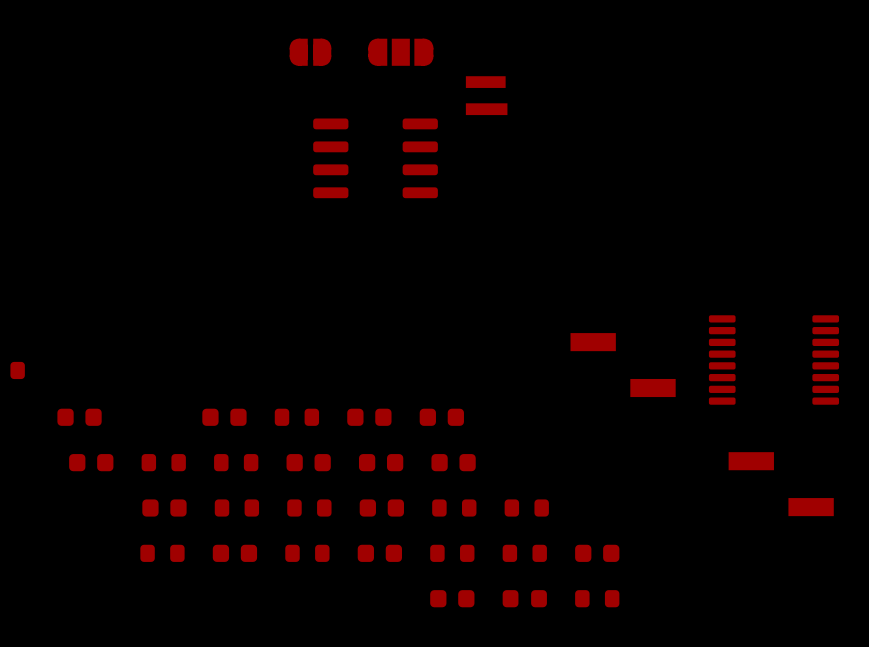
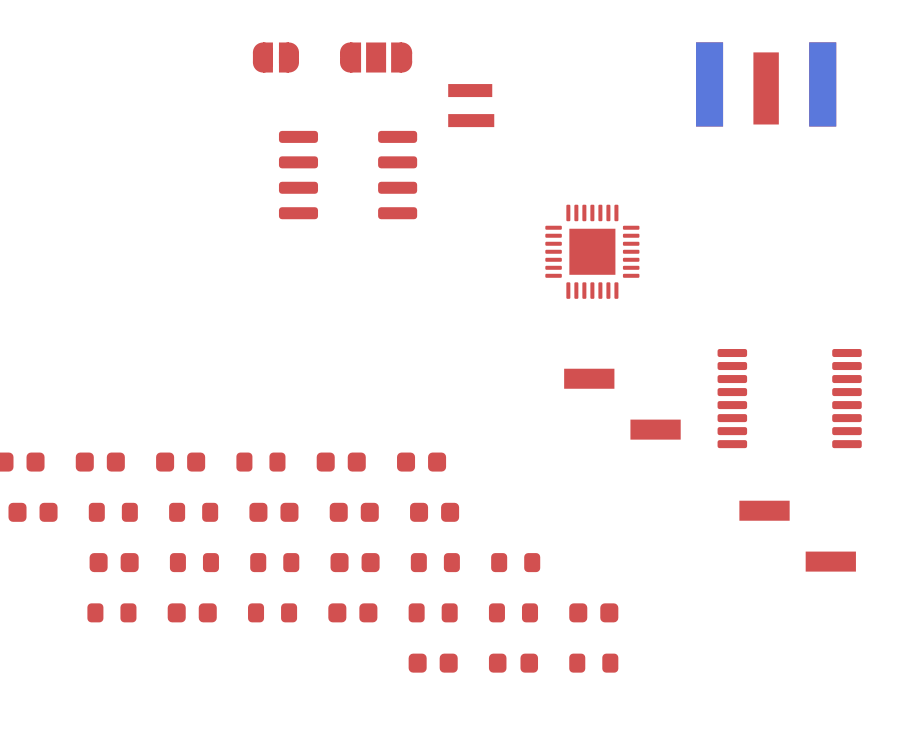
part: none -> (766, 84)
part: none -> (592, 251)
part: none -> (100, 462)

